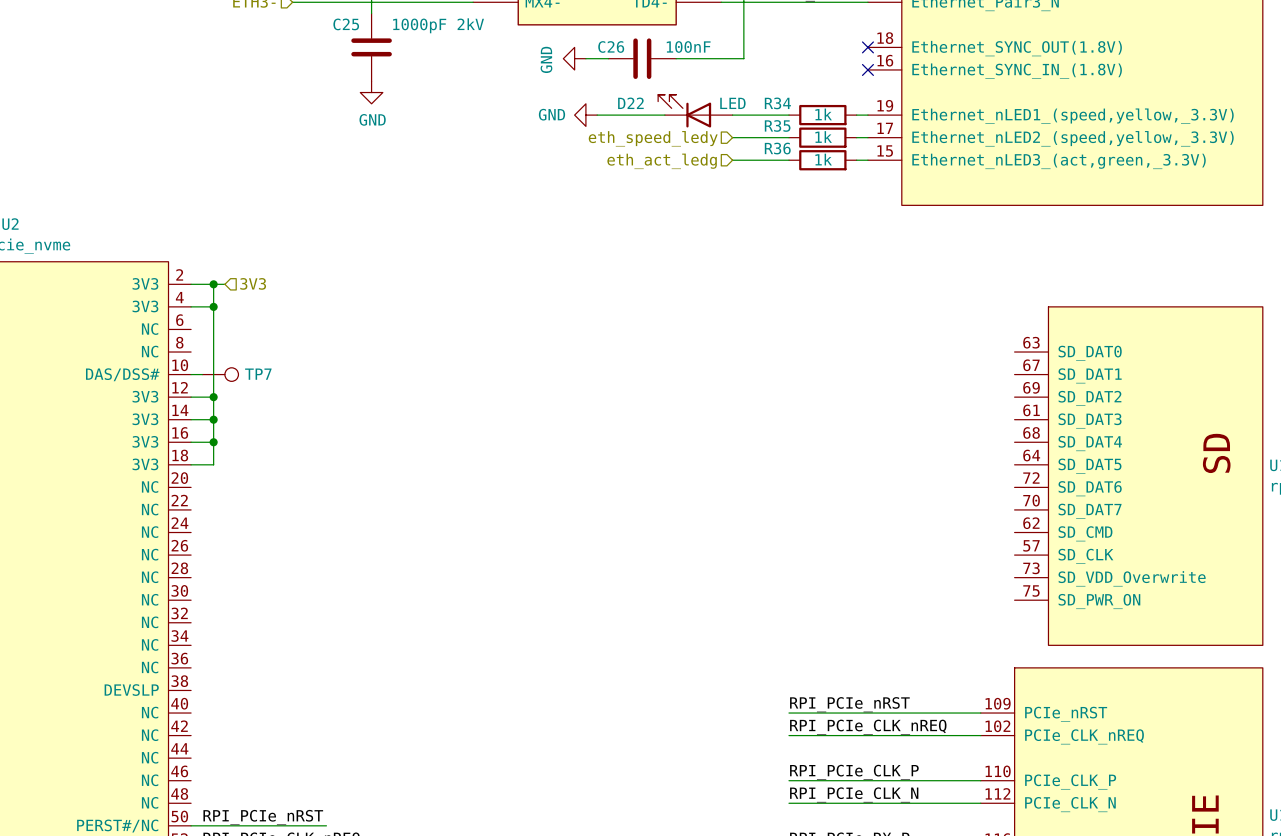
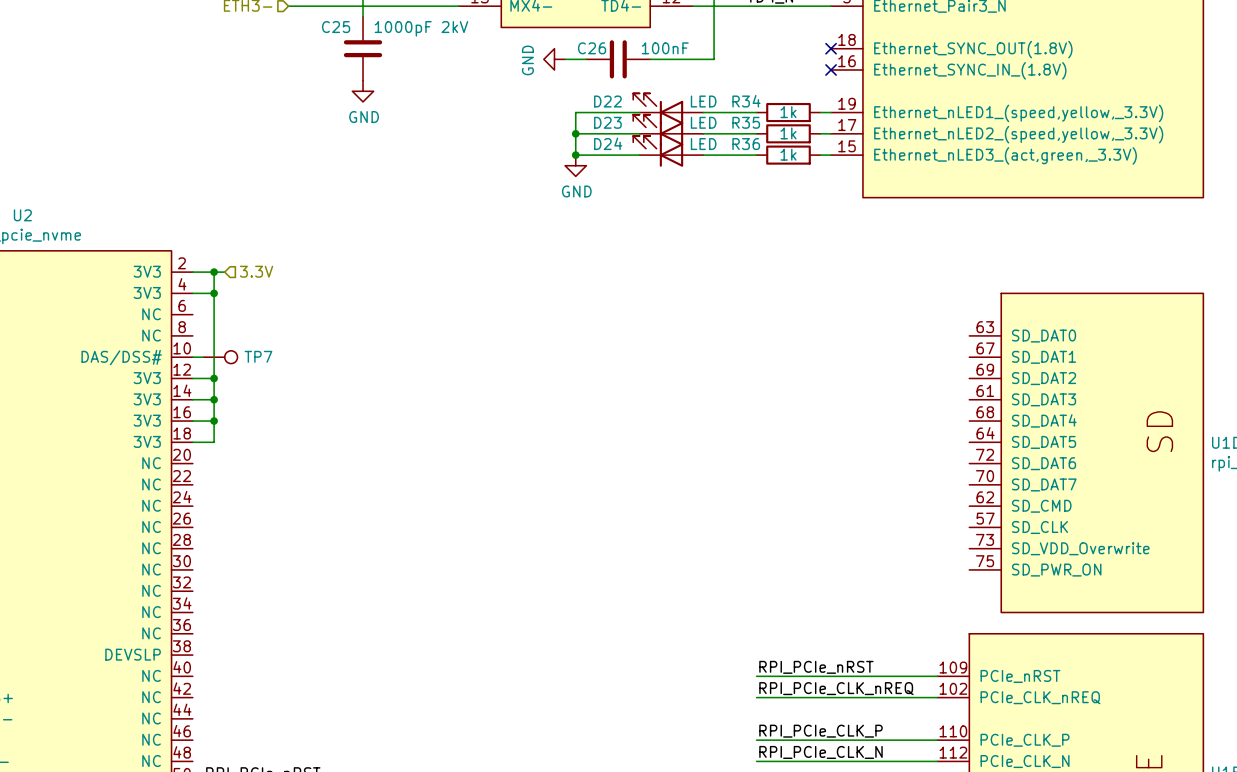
power symbol rotation: 0° (585, 115) -> 90° counterclockwise (575, 165)
power symbol position: GND (585, 115) -> GND (575, 165)
wire: none -> (575, 112) (575, 155) (639, 155)
D23: none -> LED (668, 130)
wire: none -> (575, 133) (639, 133)
junction: none -> (575, 133)
hierarchical label: eth_speed_ledy (653, 138) -> none
D24: none -> LED (668, 151)
junction: none -> (575, 155)
hierarchical label: eth_act_ledg (662, 161) -> none
hierarchical label: 3V3 (253, 283) -> 3.3V (256, 271)

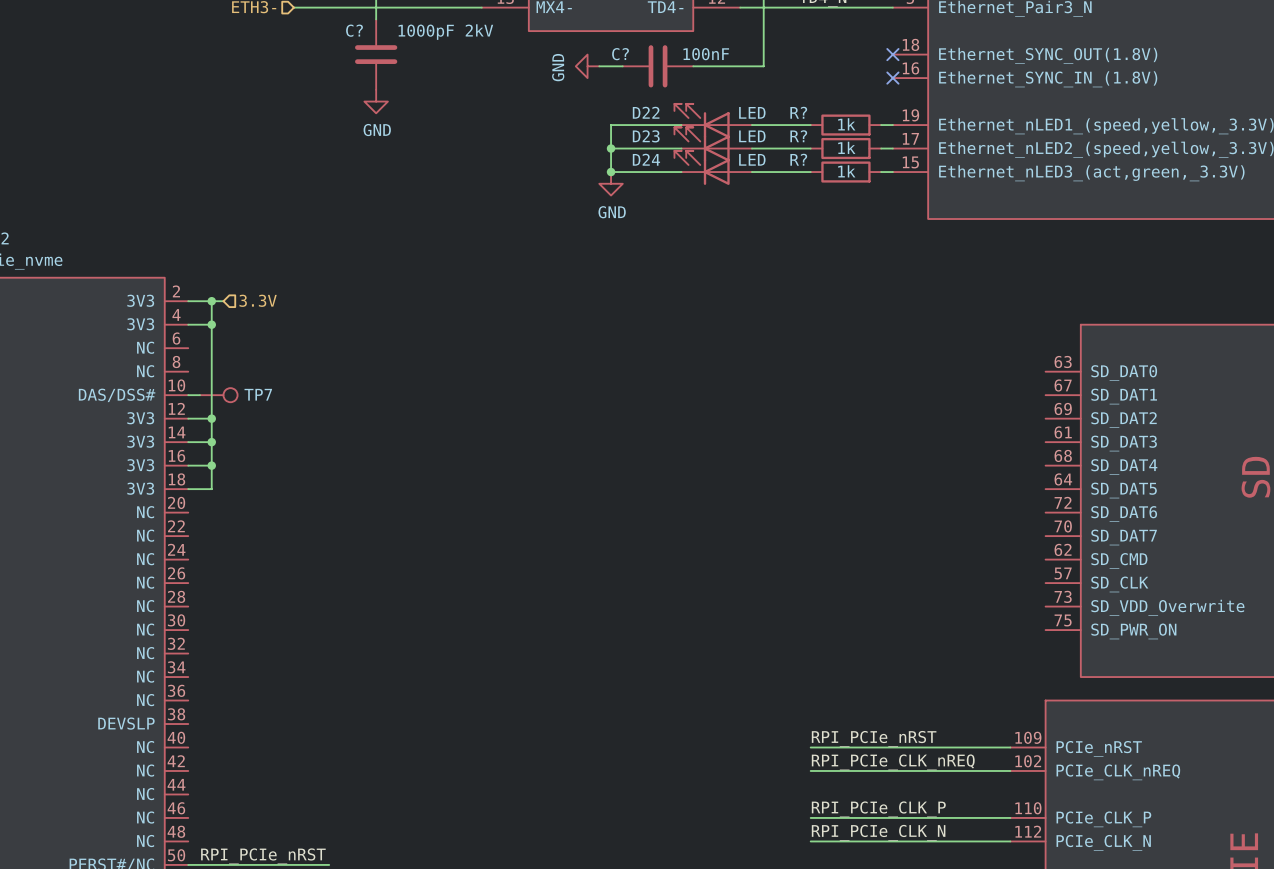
C25 name: C25 (336, 27) -> C? (354, 30)
C26 name: C26 (592, 48) -> C? (620, 54)
R34 name: R34 (746, 101) -> R? (798, 112)
R35 name: R35 (746, 122) -> R? (798, 136)
R36 name: R36 (746, 144) -> R? (798, 159)

